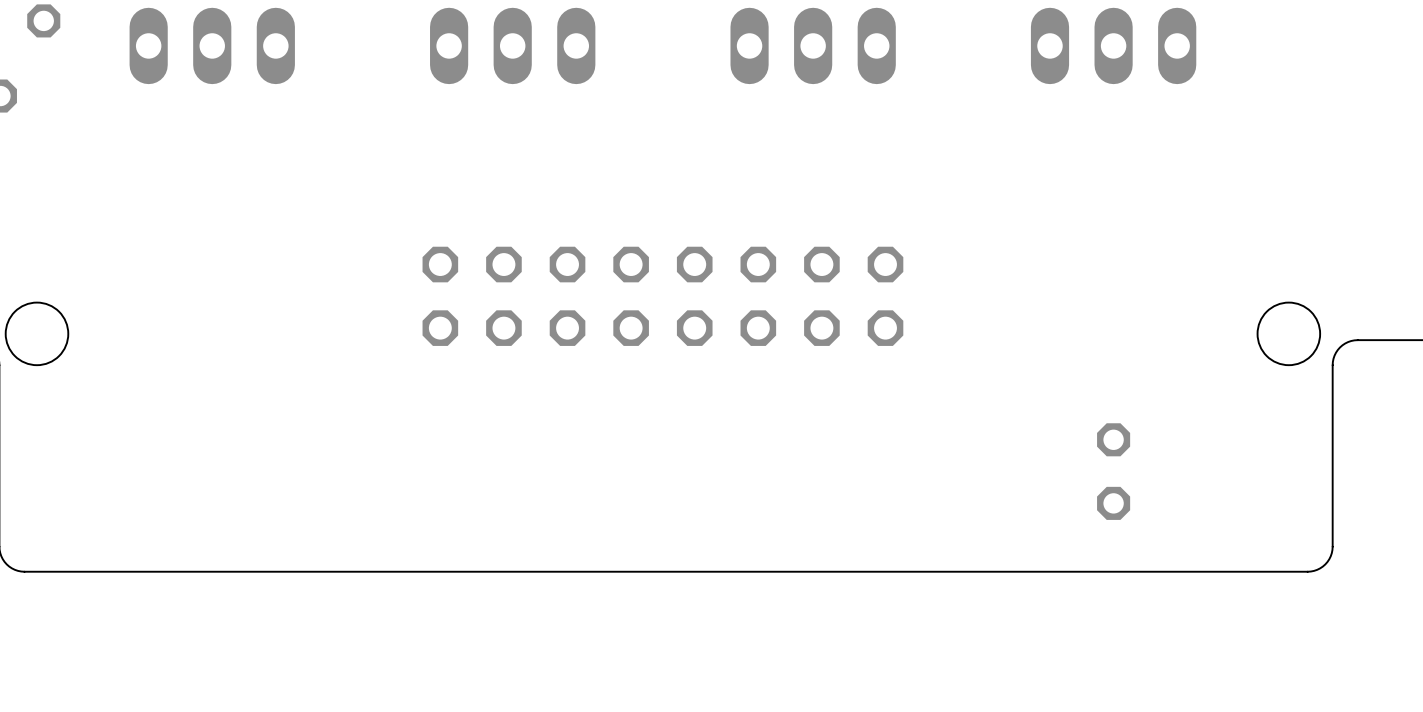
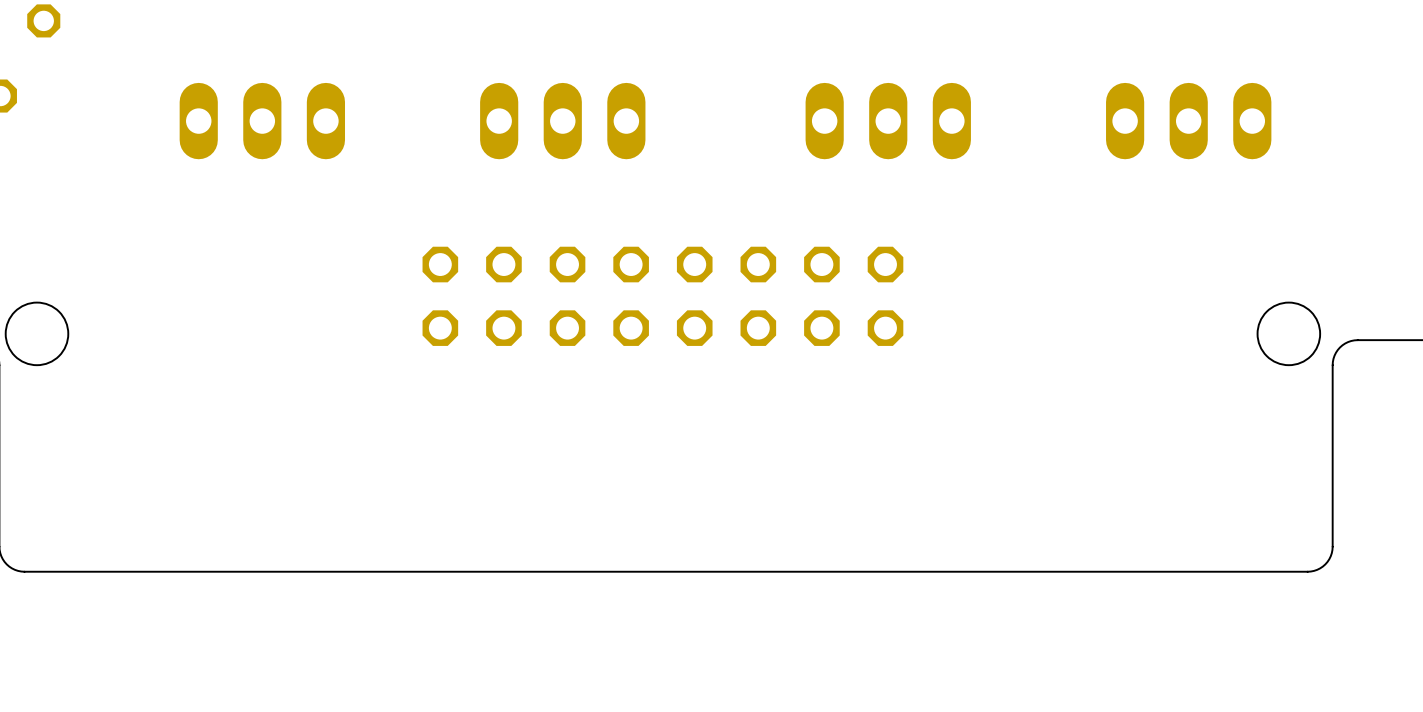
part position: (212, 45) -> (262, 121)
part position: (512, 45) -> (562, 121)
part position: (813, 45) -> (888, 121)
part position: (1113, 45) -> (1188, 121)
part: (1113, 471) -> none

